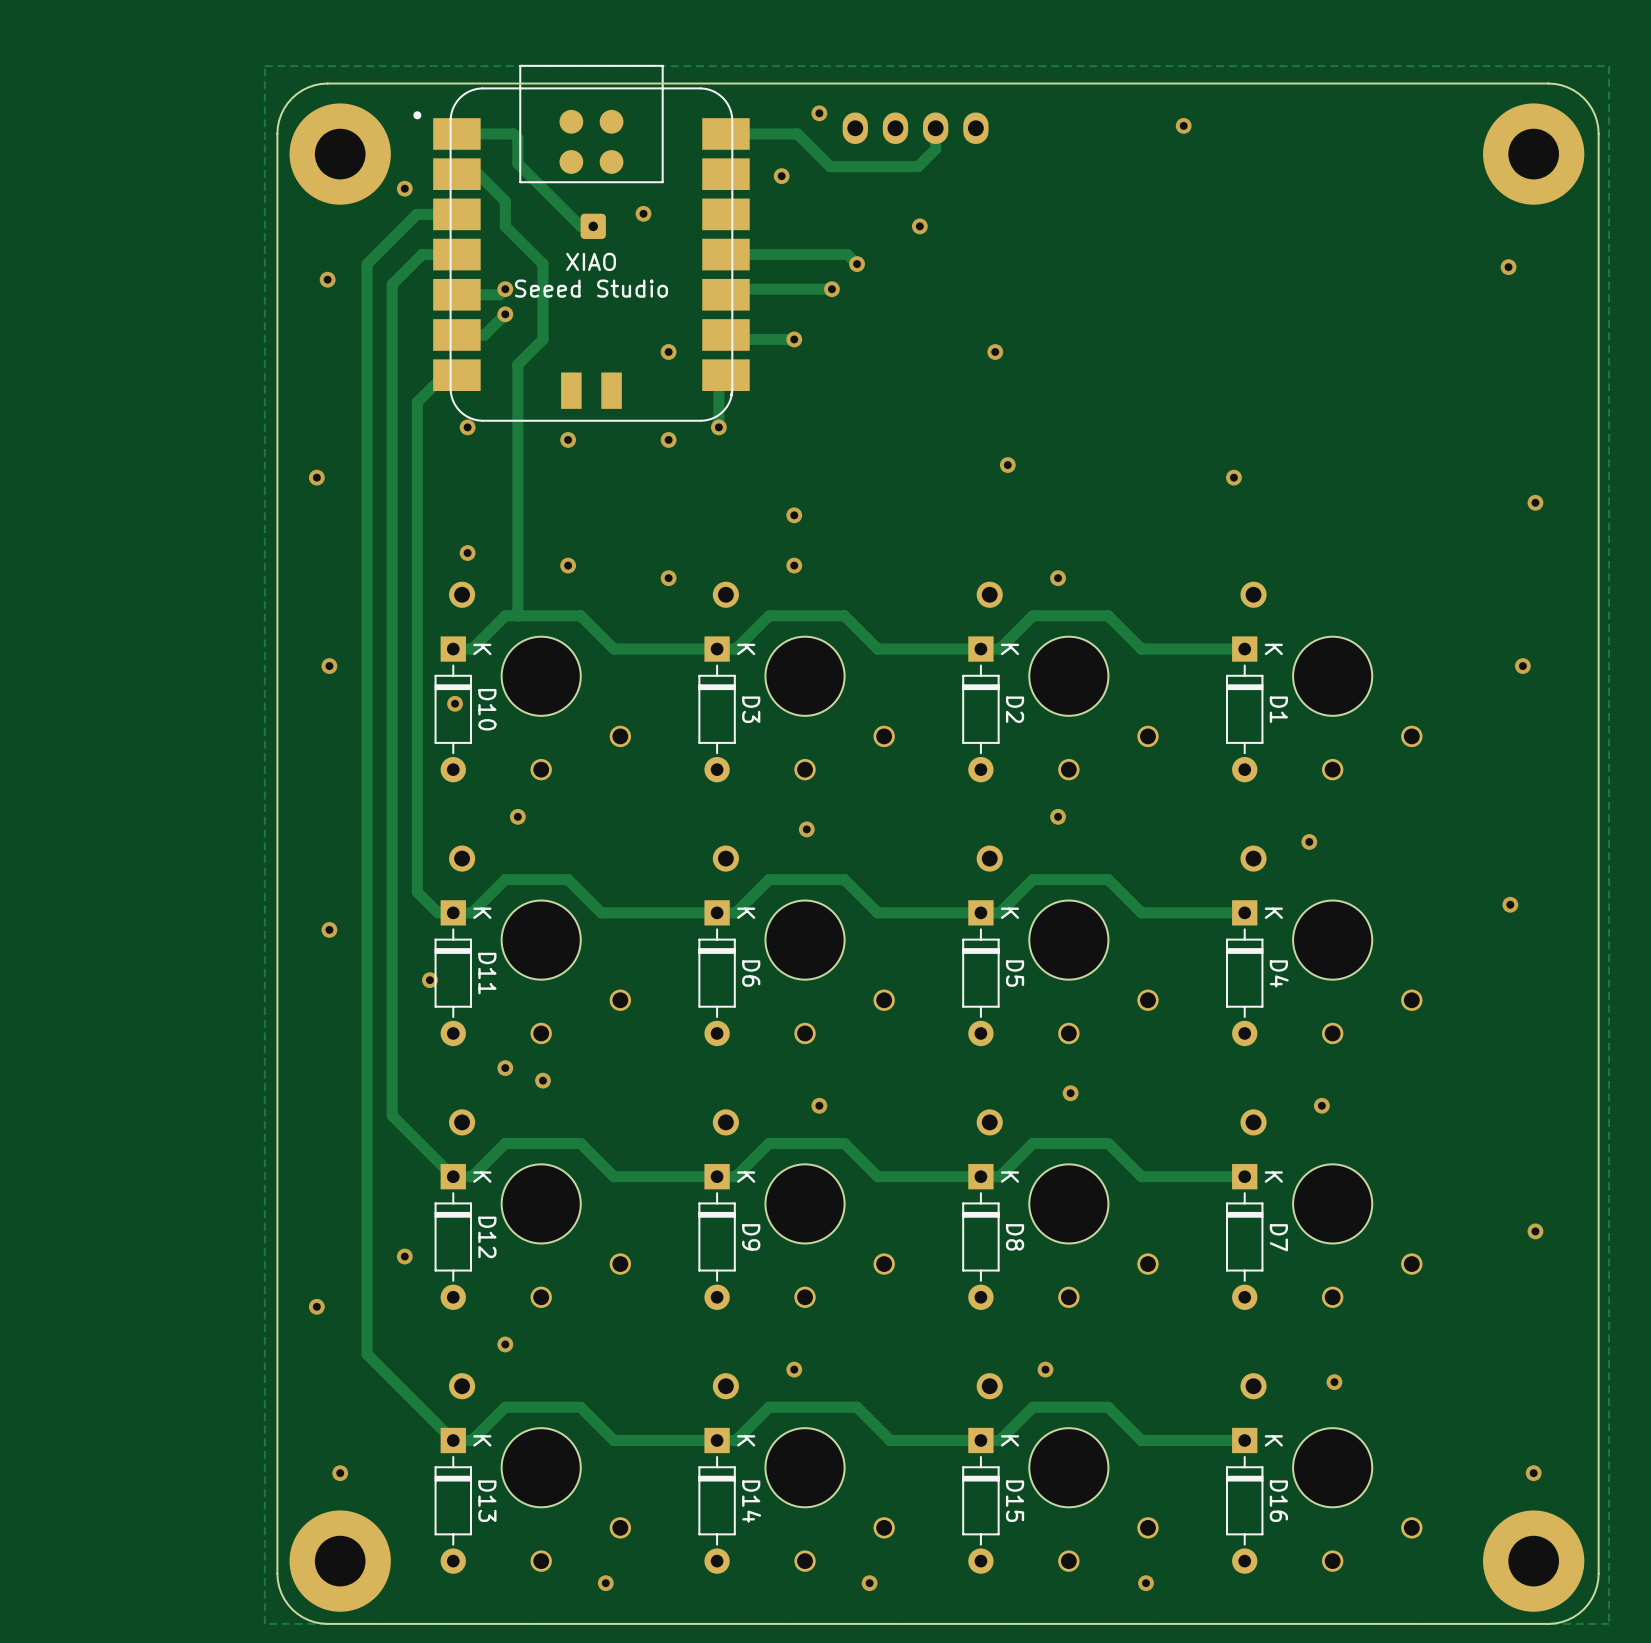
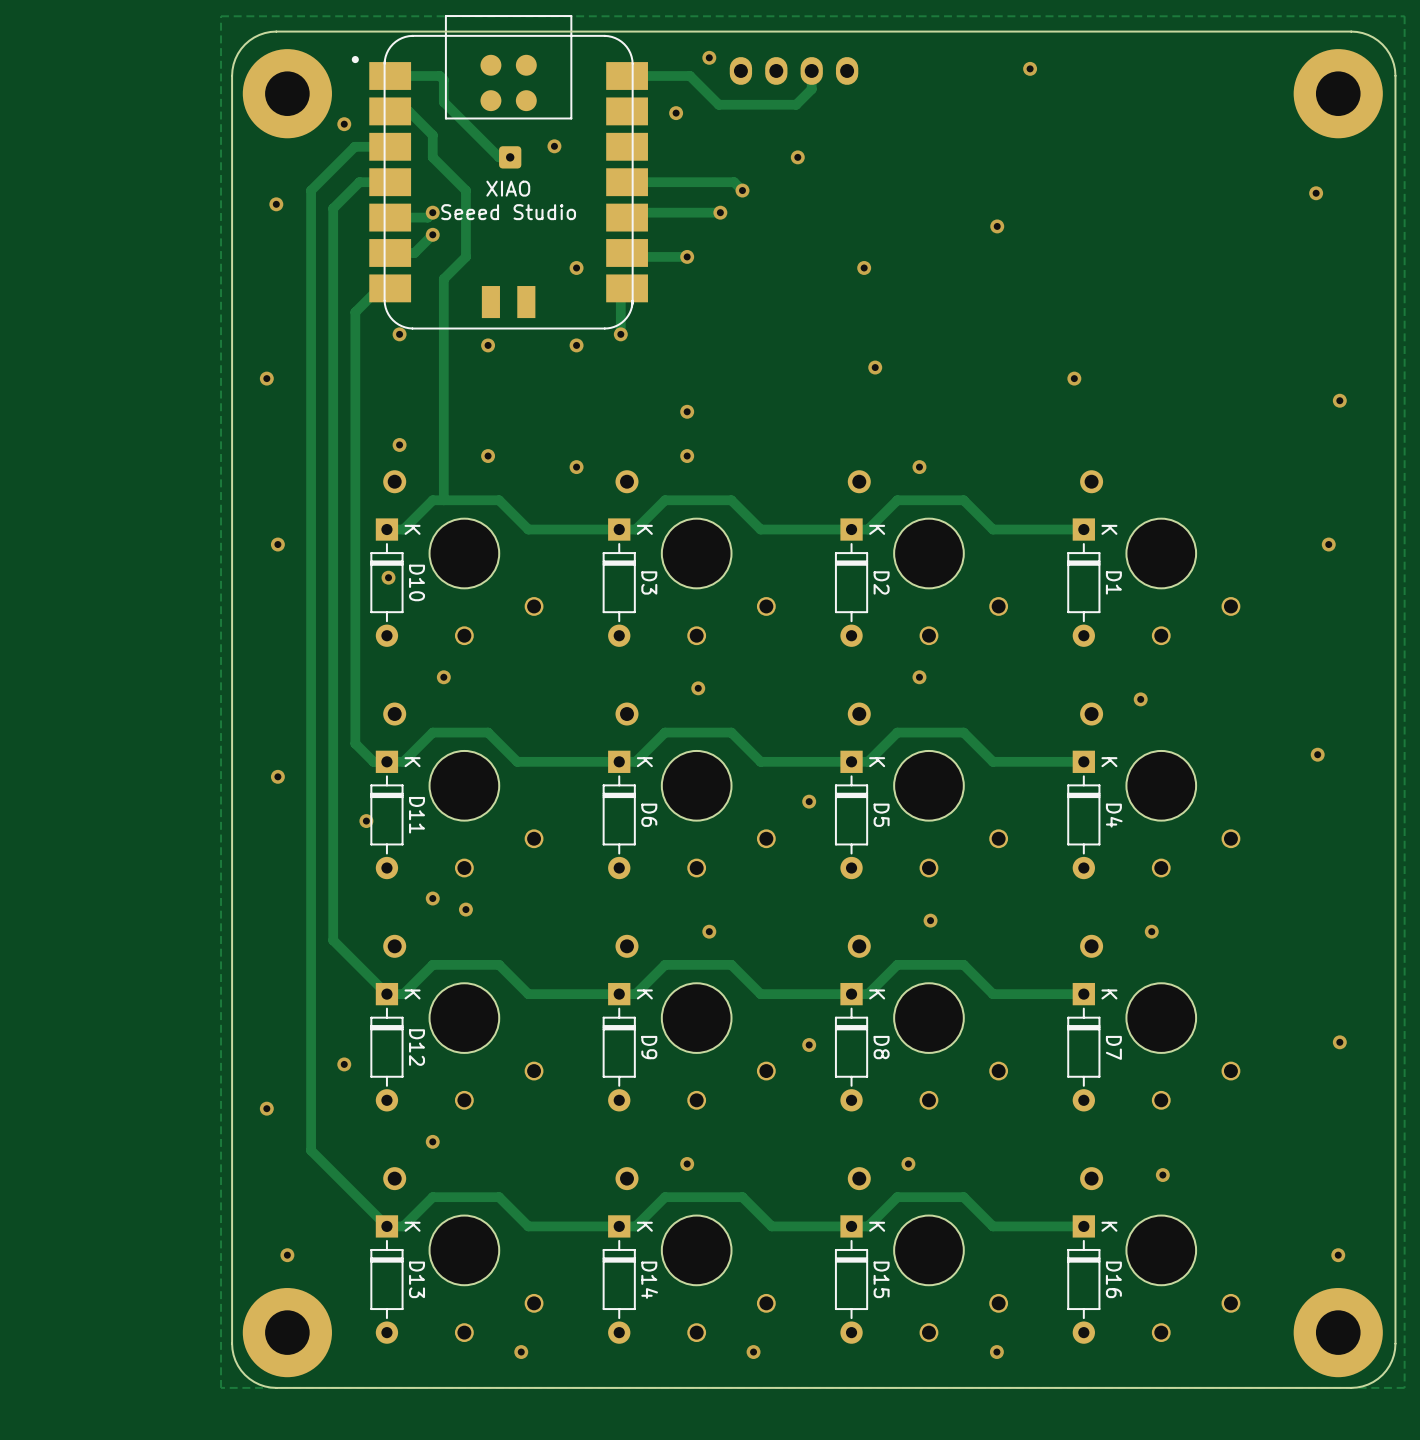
via: none -> (997, 226)
via: none -> (809, 801)
via: none -> (809, 1045)

